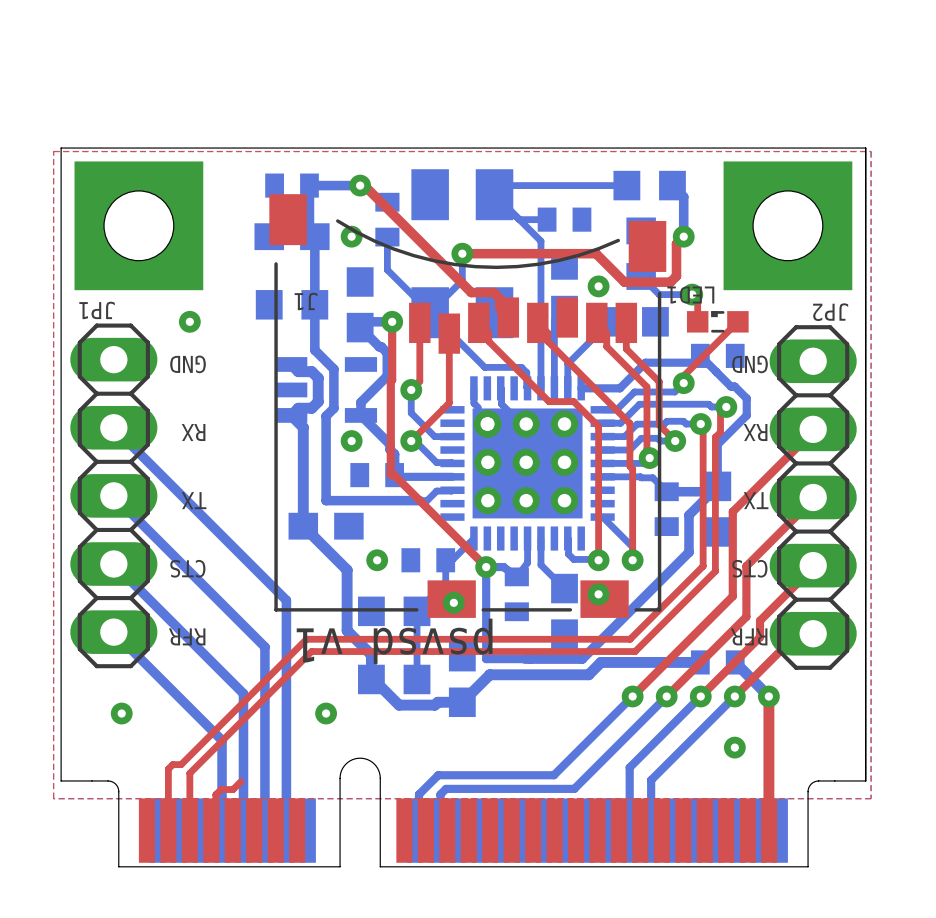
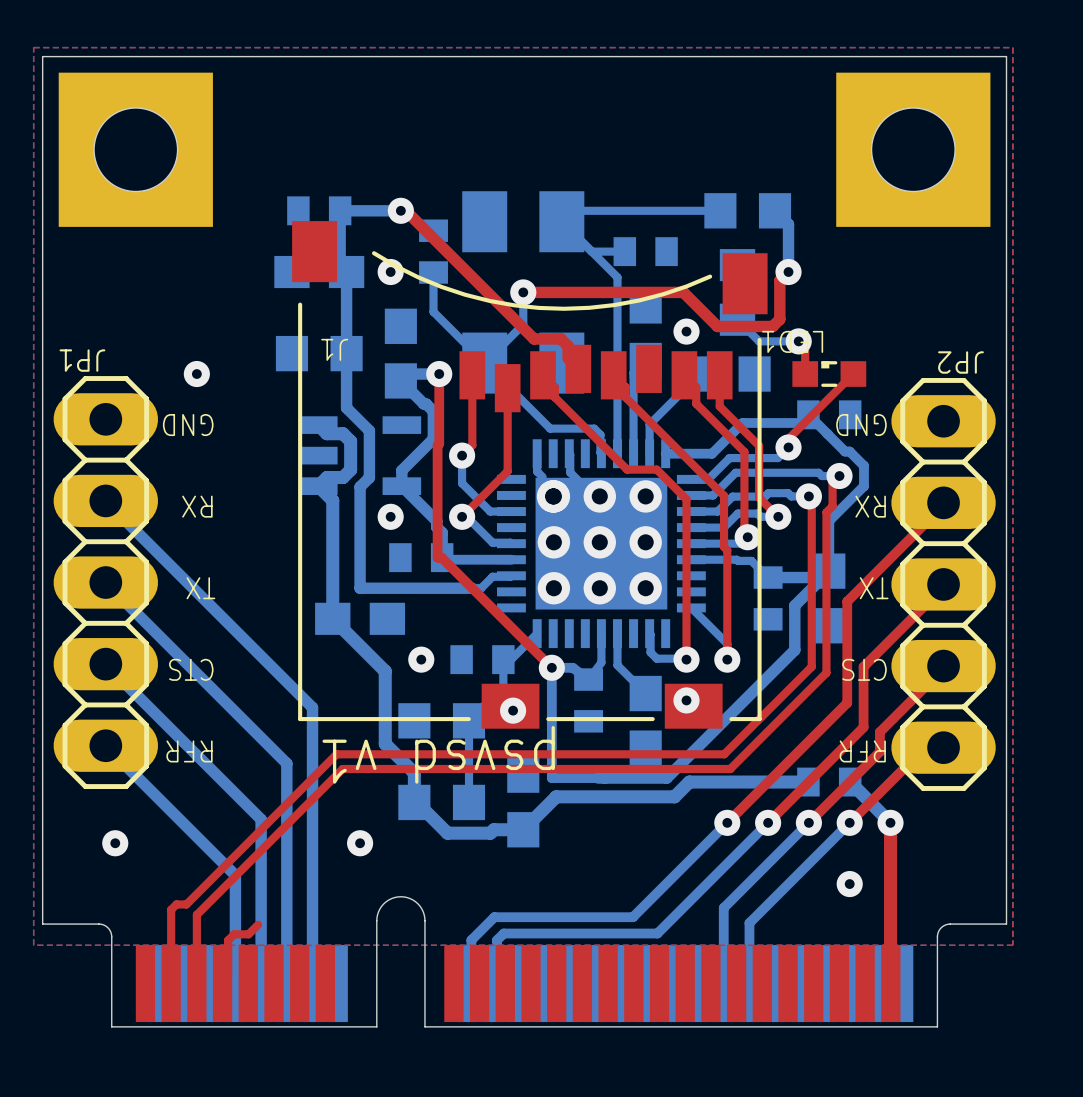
top zone outline: (53, 151) (871, 151) -> (33, 170) (33, 47) (1012, 47) (1012, 170)
part: none -> (524, 541)
part: (463, 507) -> none

